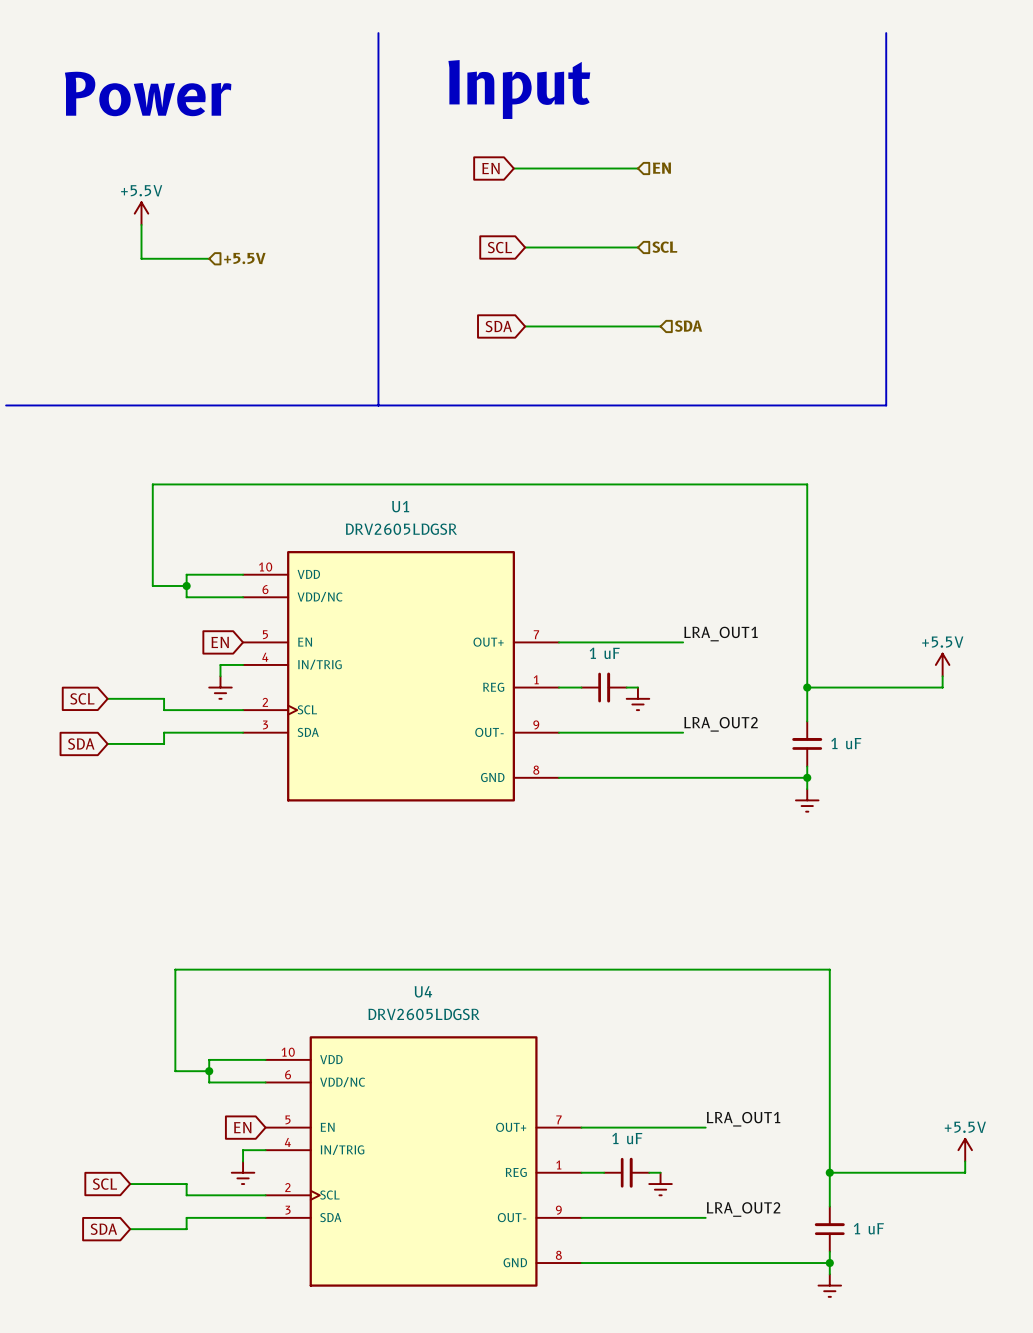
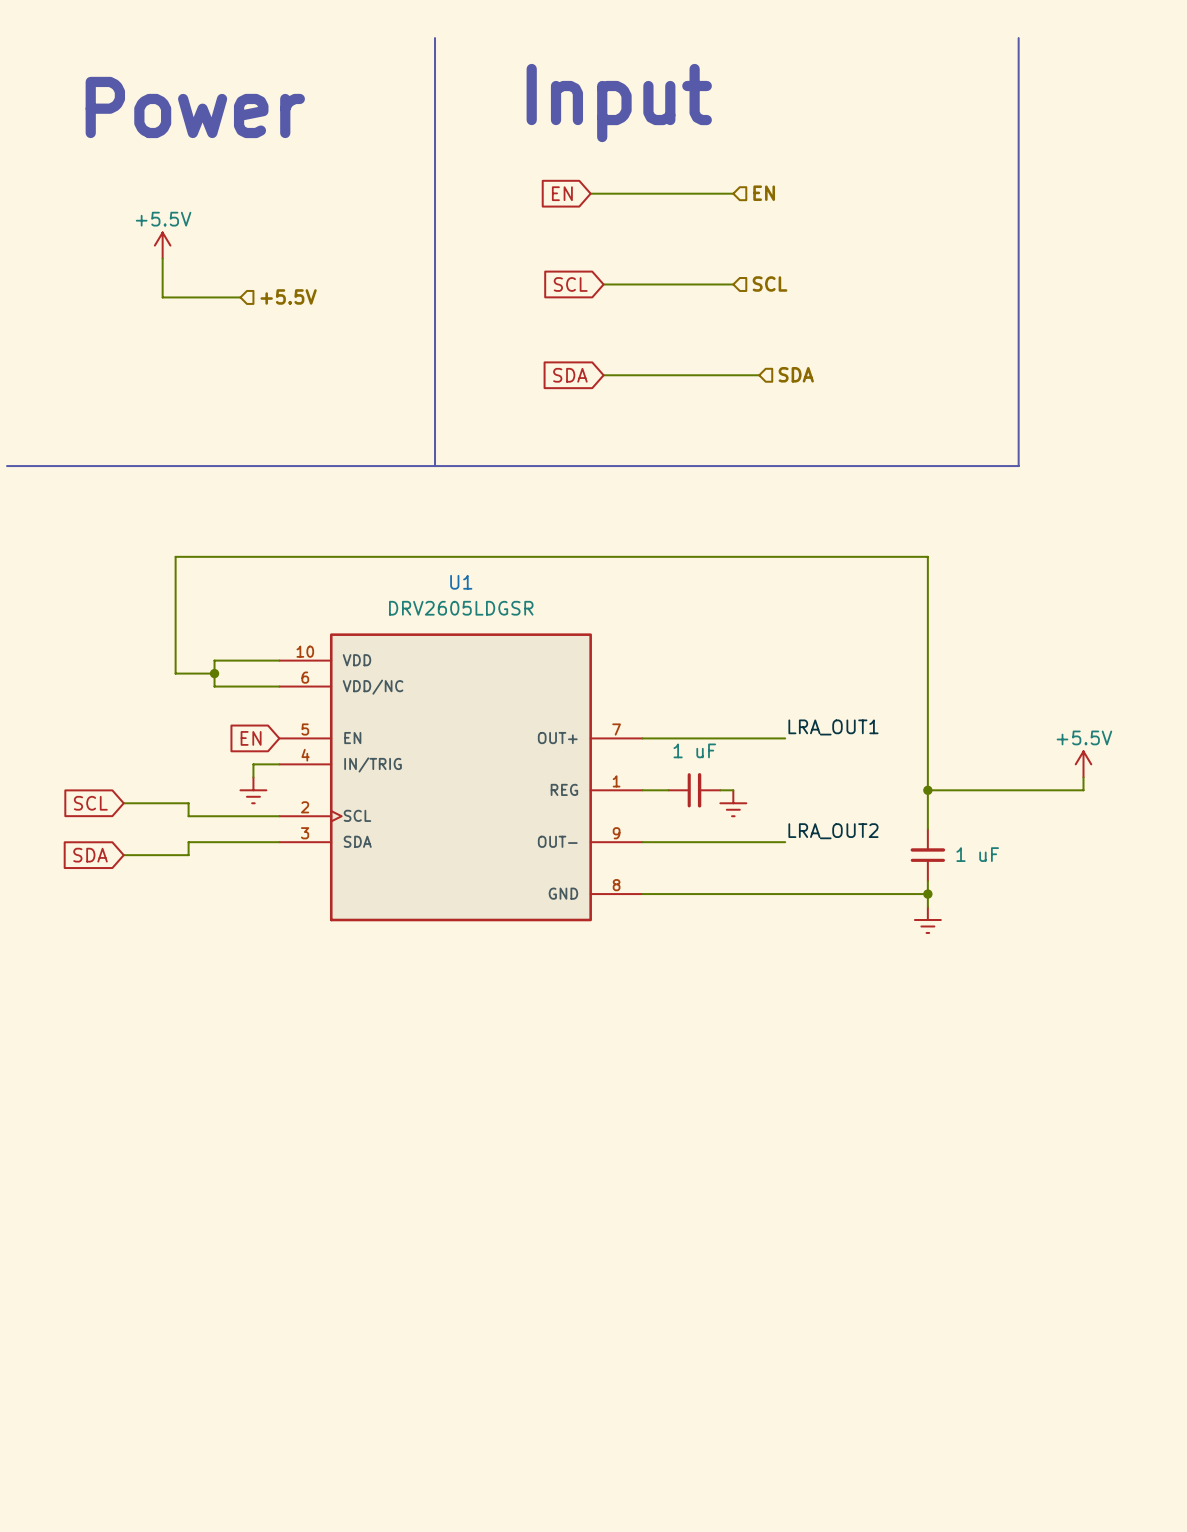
wire: (265, 1059) (209, 1059) (209, 1082) (265, 1082) -> none
wire: (209, 1071) (175, 1071) (175, 969) (829, 969) (829, 1206) -> none
junction: (209, 1071) -> none
label: LRA_OUT1 (743, 1119) -> none
global label: EN (242, 1127) -> none
wire: (581, 1127) (705, 1127) -> none
wire: (265, 1150) (243, 1150) (243, 1161) -> none
power symbol: +5.5V (965, 1150) -> none
U4: DRV2605LDGSR (423, 1161) -> none
wire: (965, 1161) (965, 1172) (829, 1172) -> none
power symbol: (243, 1172) -> none
wire: (581, 1172) (604, 1172) -> none
part: 1 uF (626, 1172) -> none
wire: (649, 1172) (660, 1172) -> none
junction: (829, 1172) -> none
global label: SCL (104, 1184) -> none
wire: (130, 1184) (186, 1184) (186, 1195) (265, 1195) -> none
power symbol: (660, 1184) -> none
label: LRA_OUT2 (743, 1209) -> none
wire: (265, 1217) (186, 1217) (186, 1229) (130, 1229) -> none
wire: (581, 1217) (705, 1217) -> none
global label: SDA (103, 1229) -> none
part: 1 uF (829, 1229) -> none
wire: (829, 1251) (829, 1274) -> none
wire: (581, 1263) (829, 1263) -> none
junction: (829, 1263) -> none
power symbol: (829, 1285) -> none

